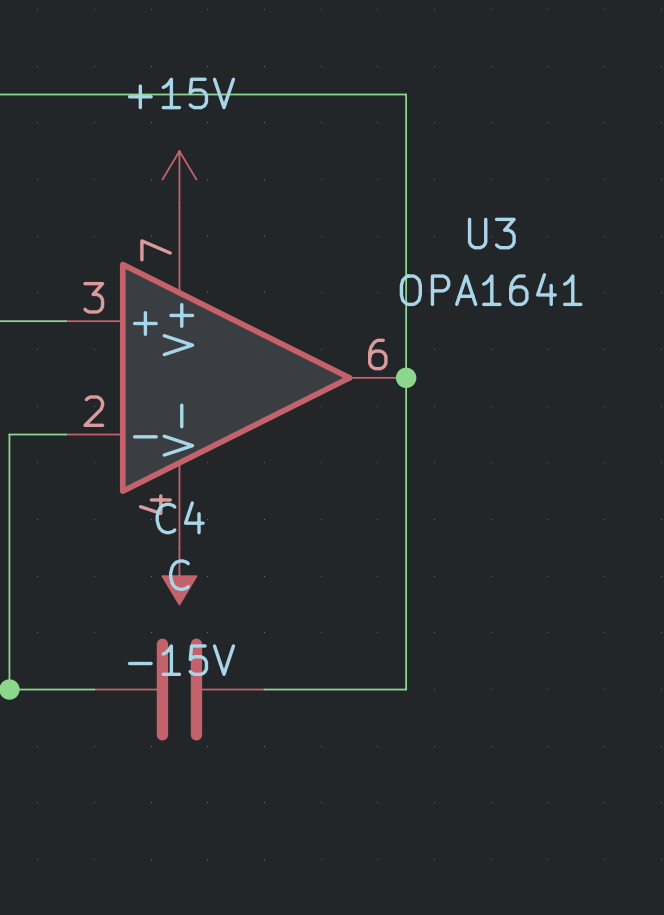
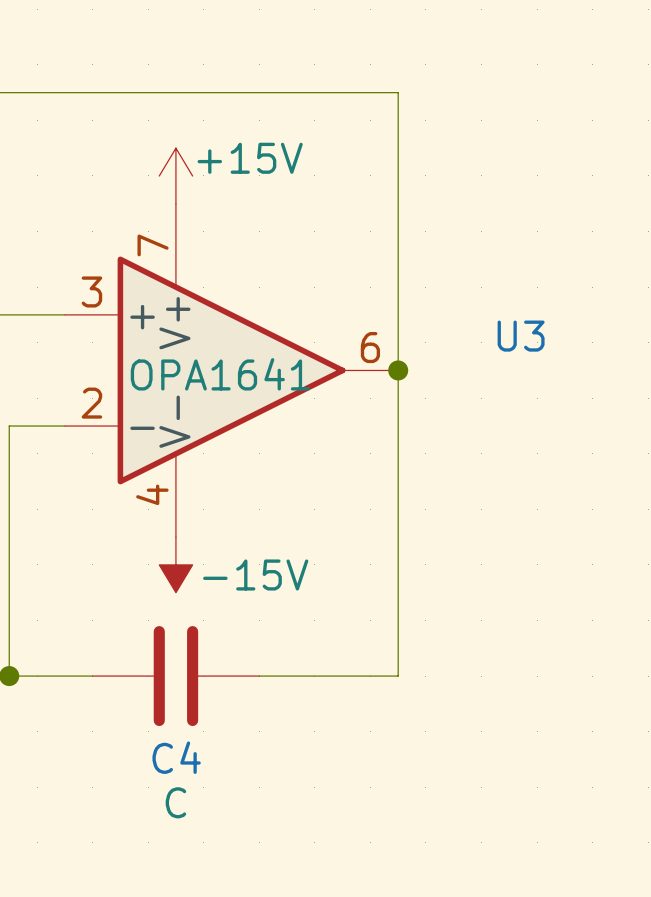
power symbol text position: +15V (181, 93) -> +15V (250, 158)
U3 name position: U3 (491, 233) -> U3 (521, 336)
U3 value position: OPA1641 (491, 289) -> OPA1641 (220, 374)
C4 name position: C4 (180, 517) -> C4 (176, 757)
C4 value position: C (179, 575) -> C (175, 802)
power symbol text position: -15V (181, 660) -> -15V (255, 575)

